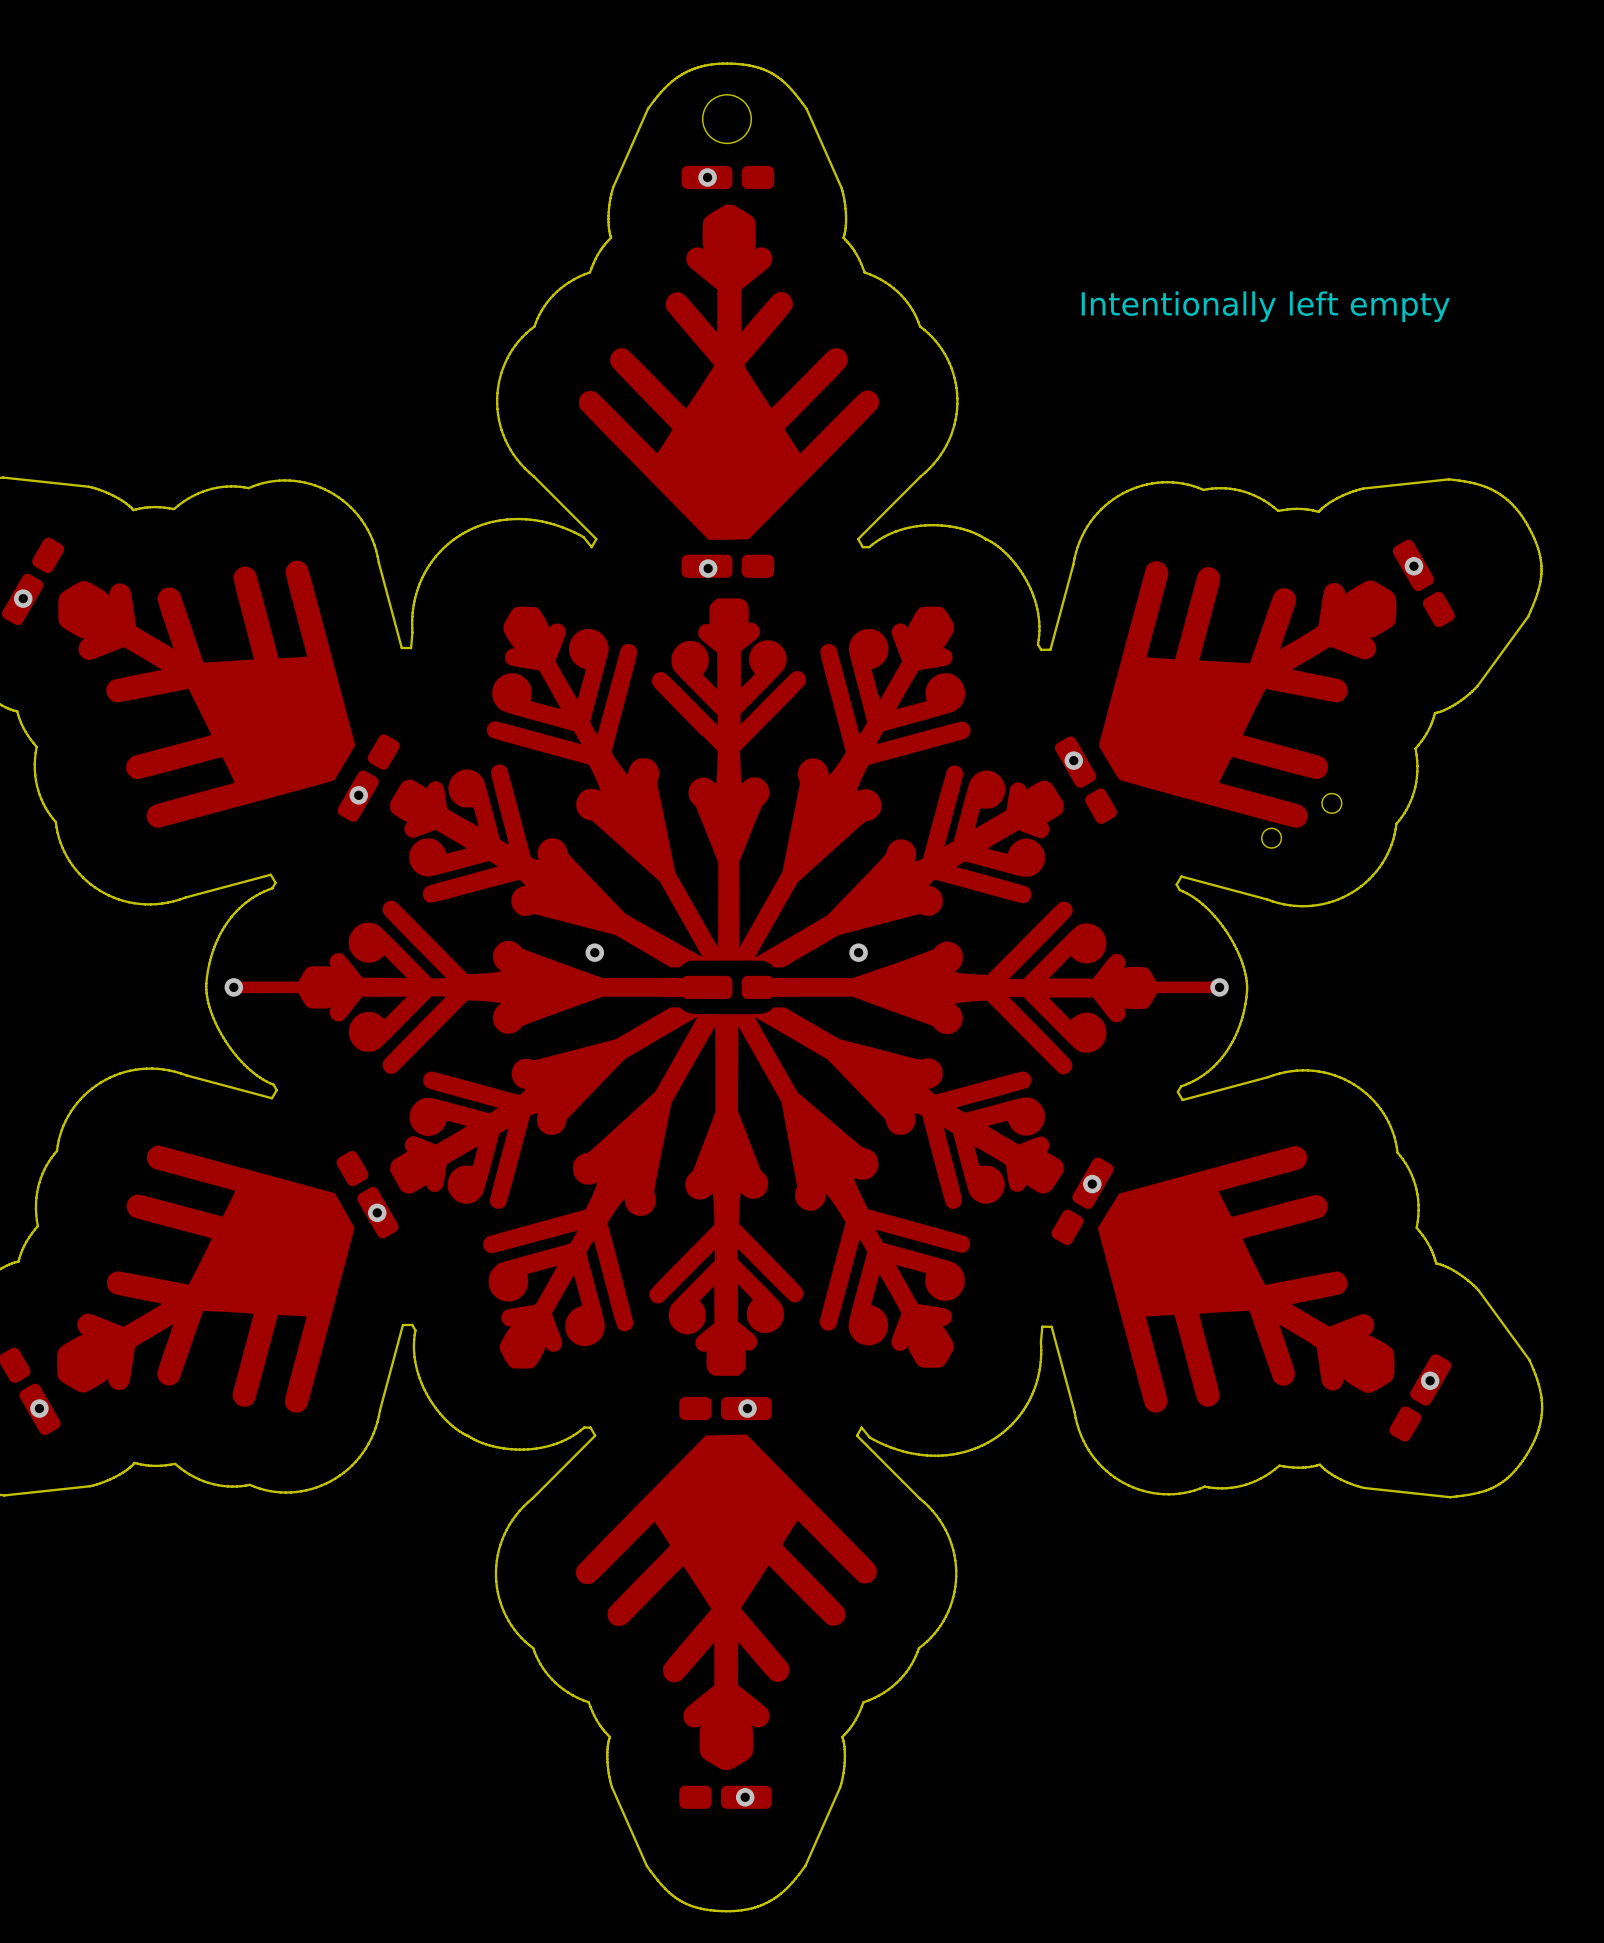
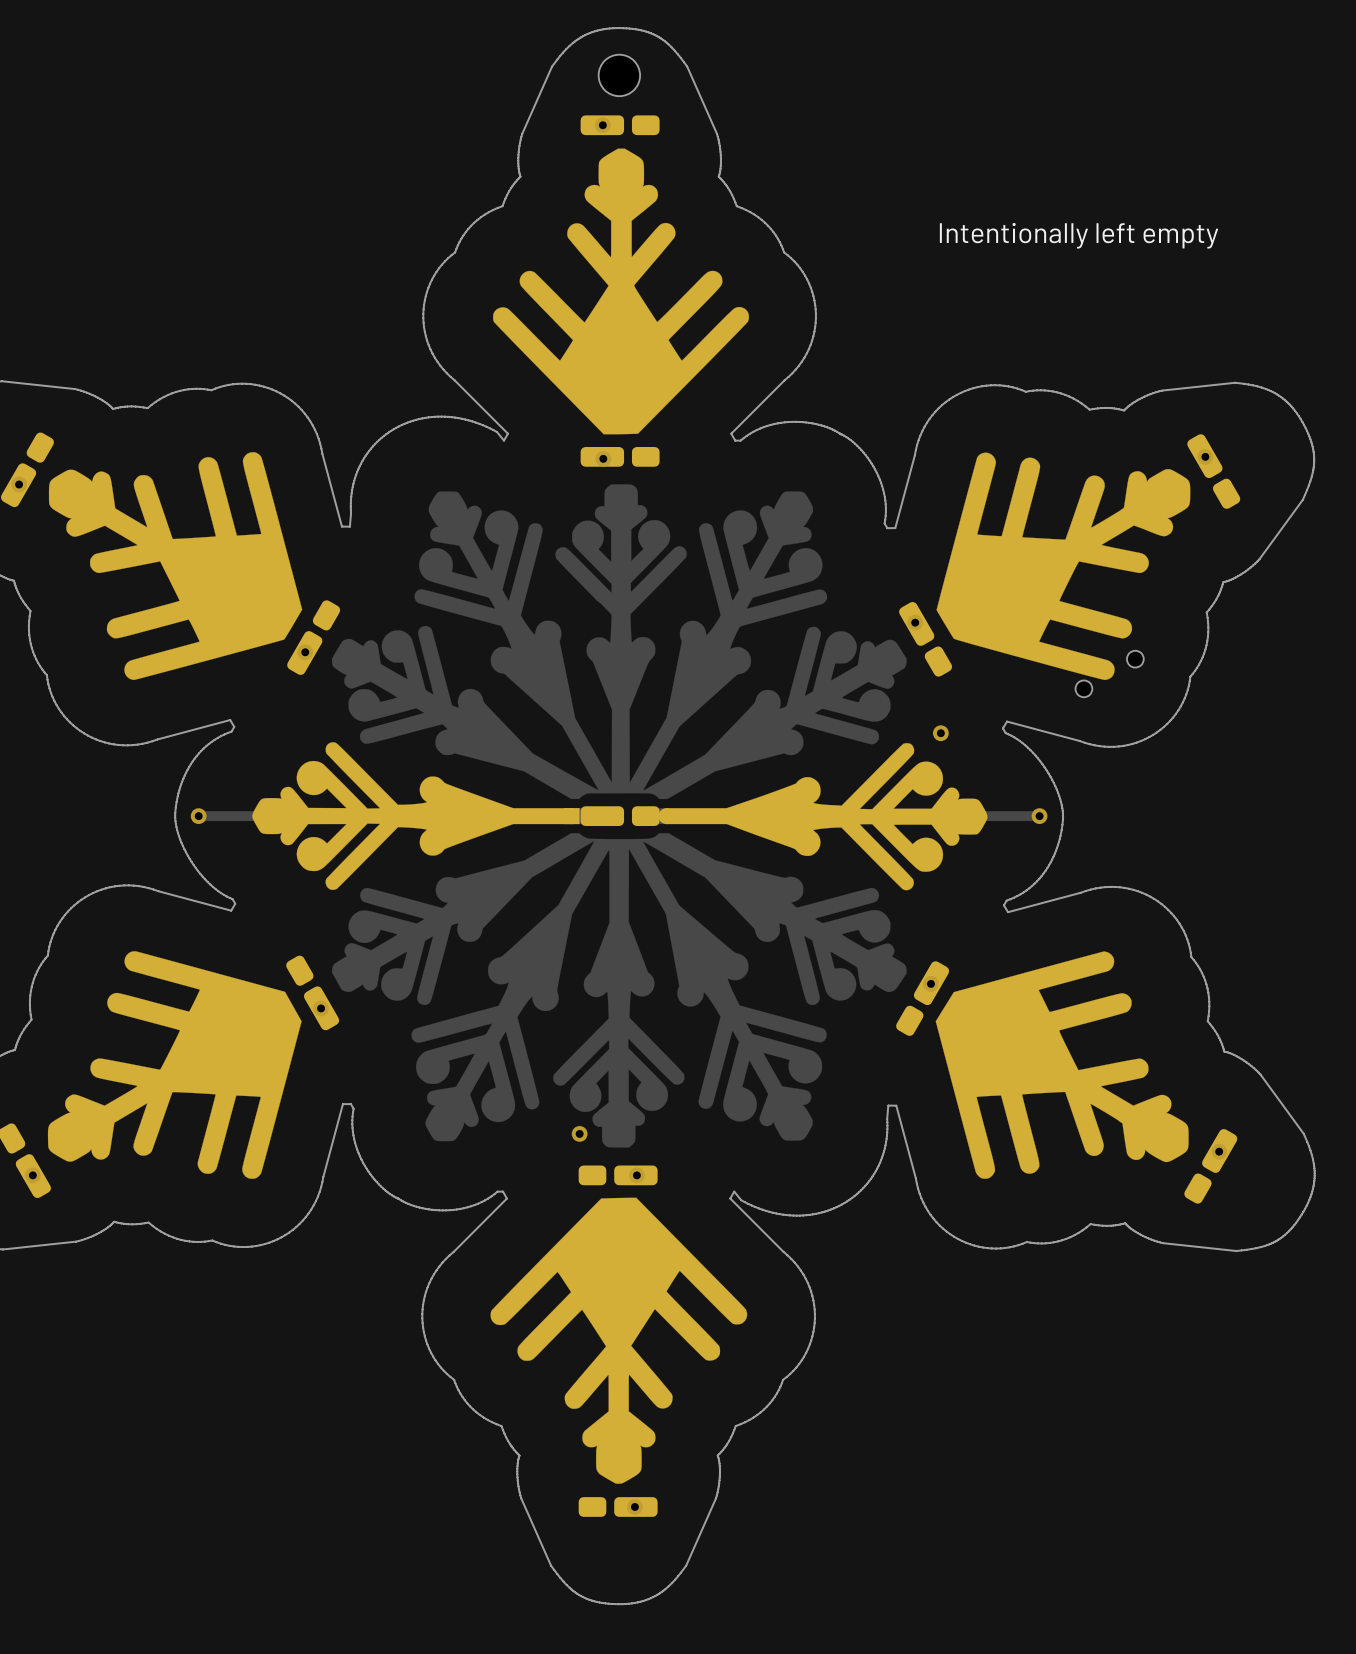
via: none -> (940, 733)
via: (594, 952) -> none
via: (858, 952) -> none
via: none -> (579, 1133)

